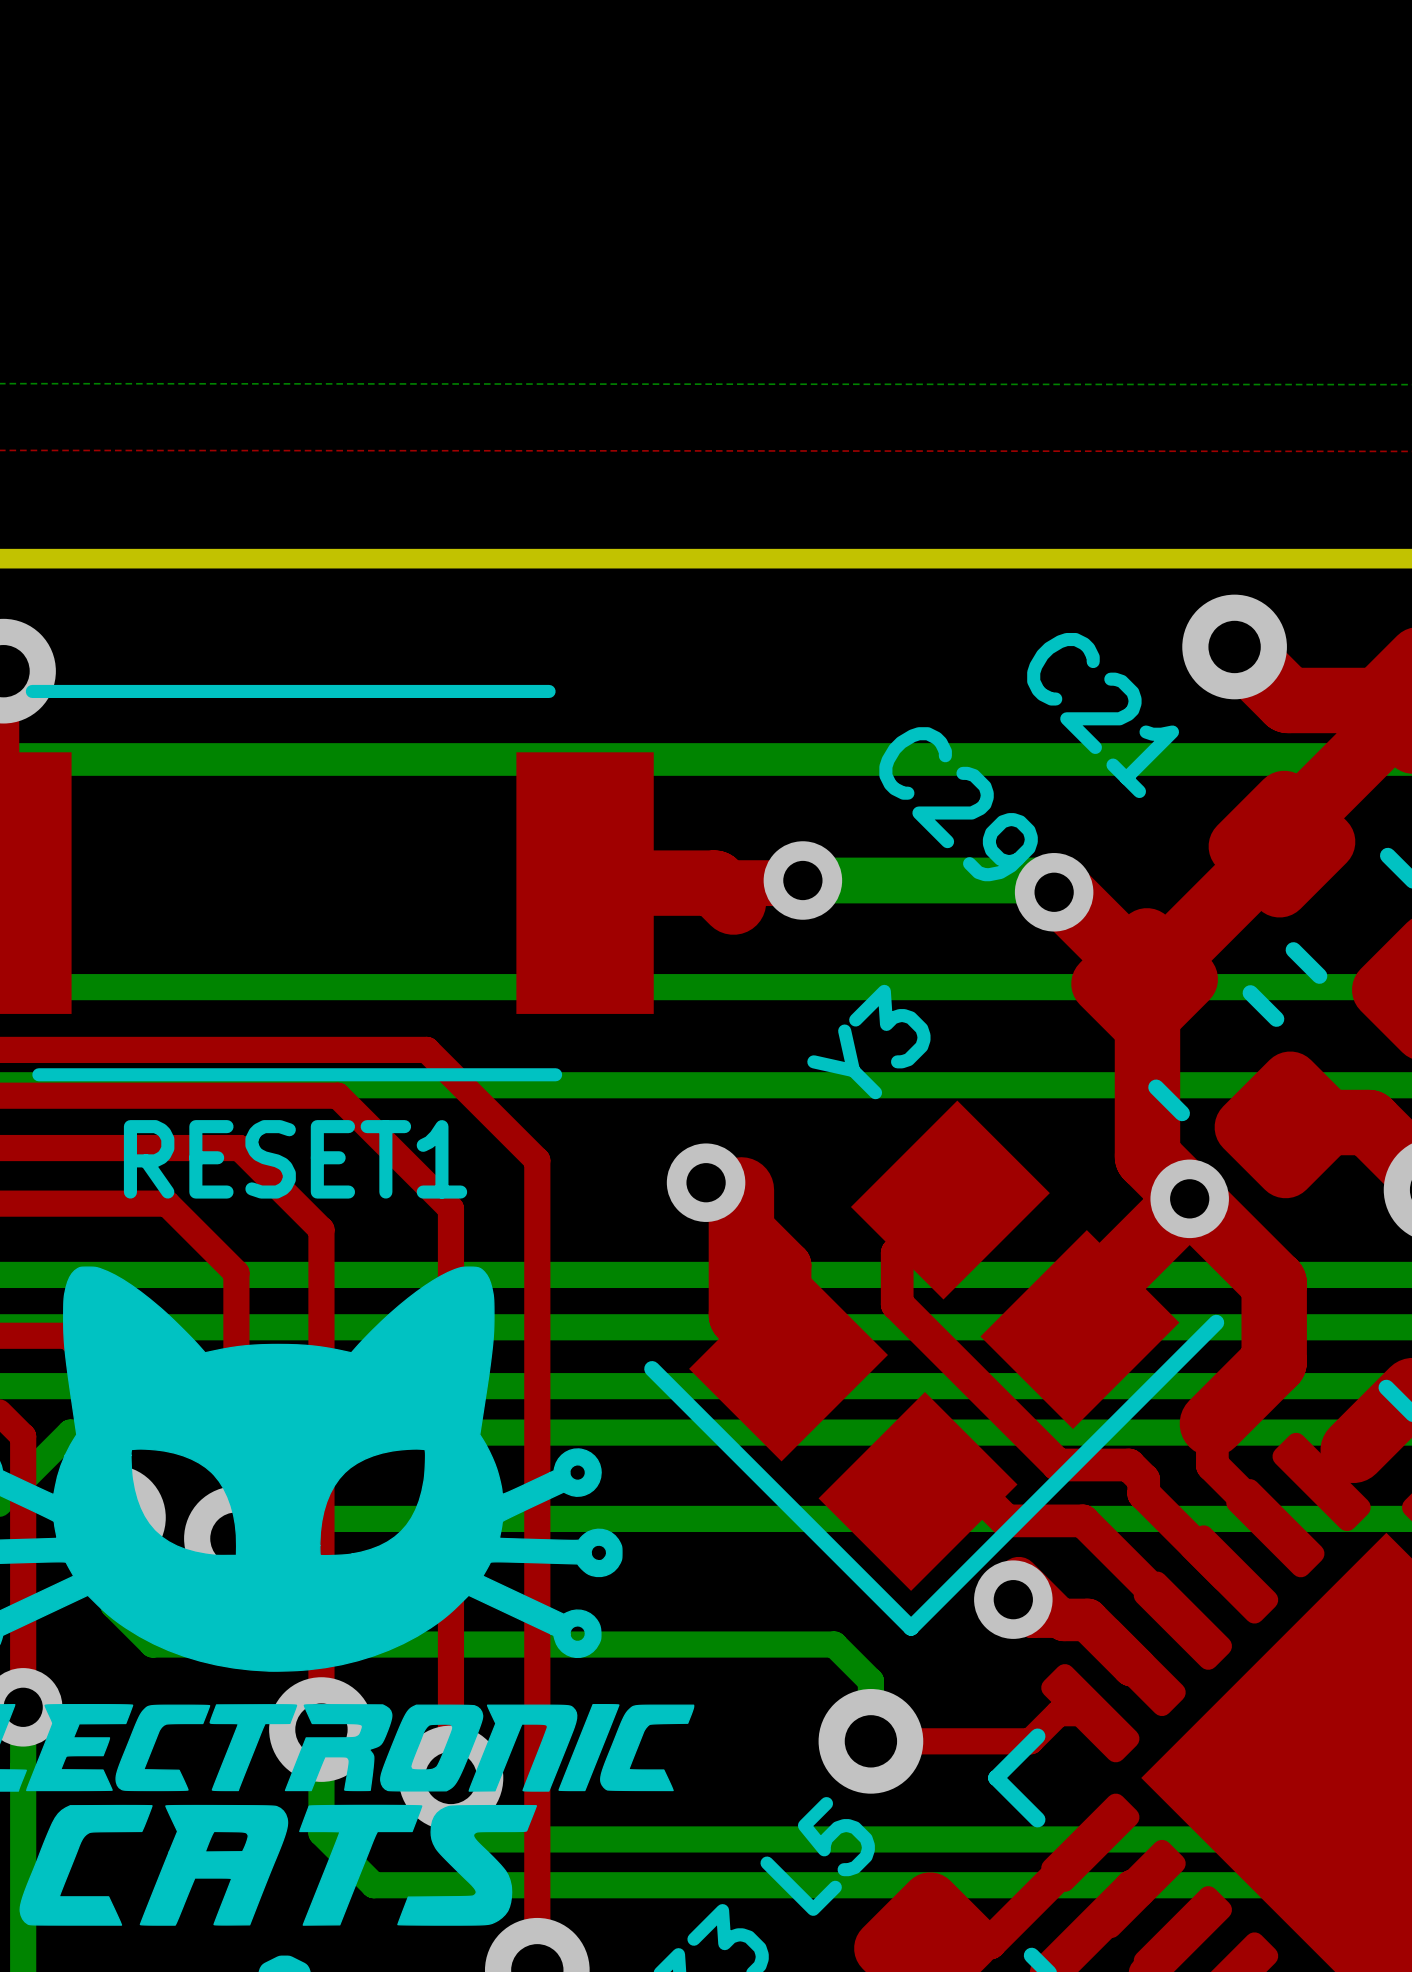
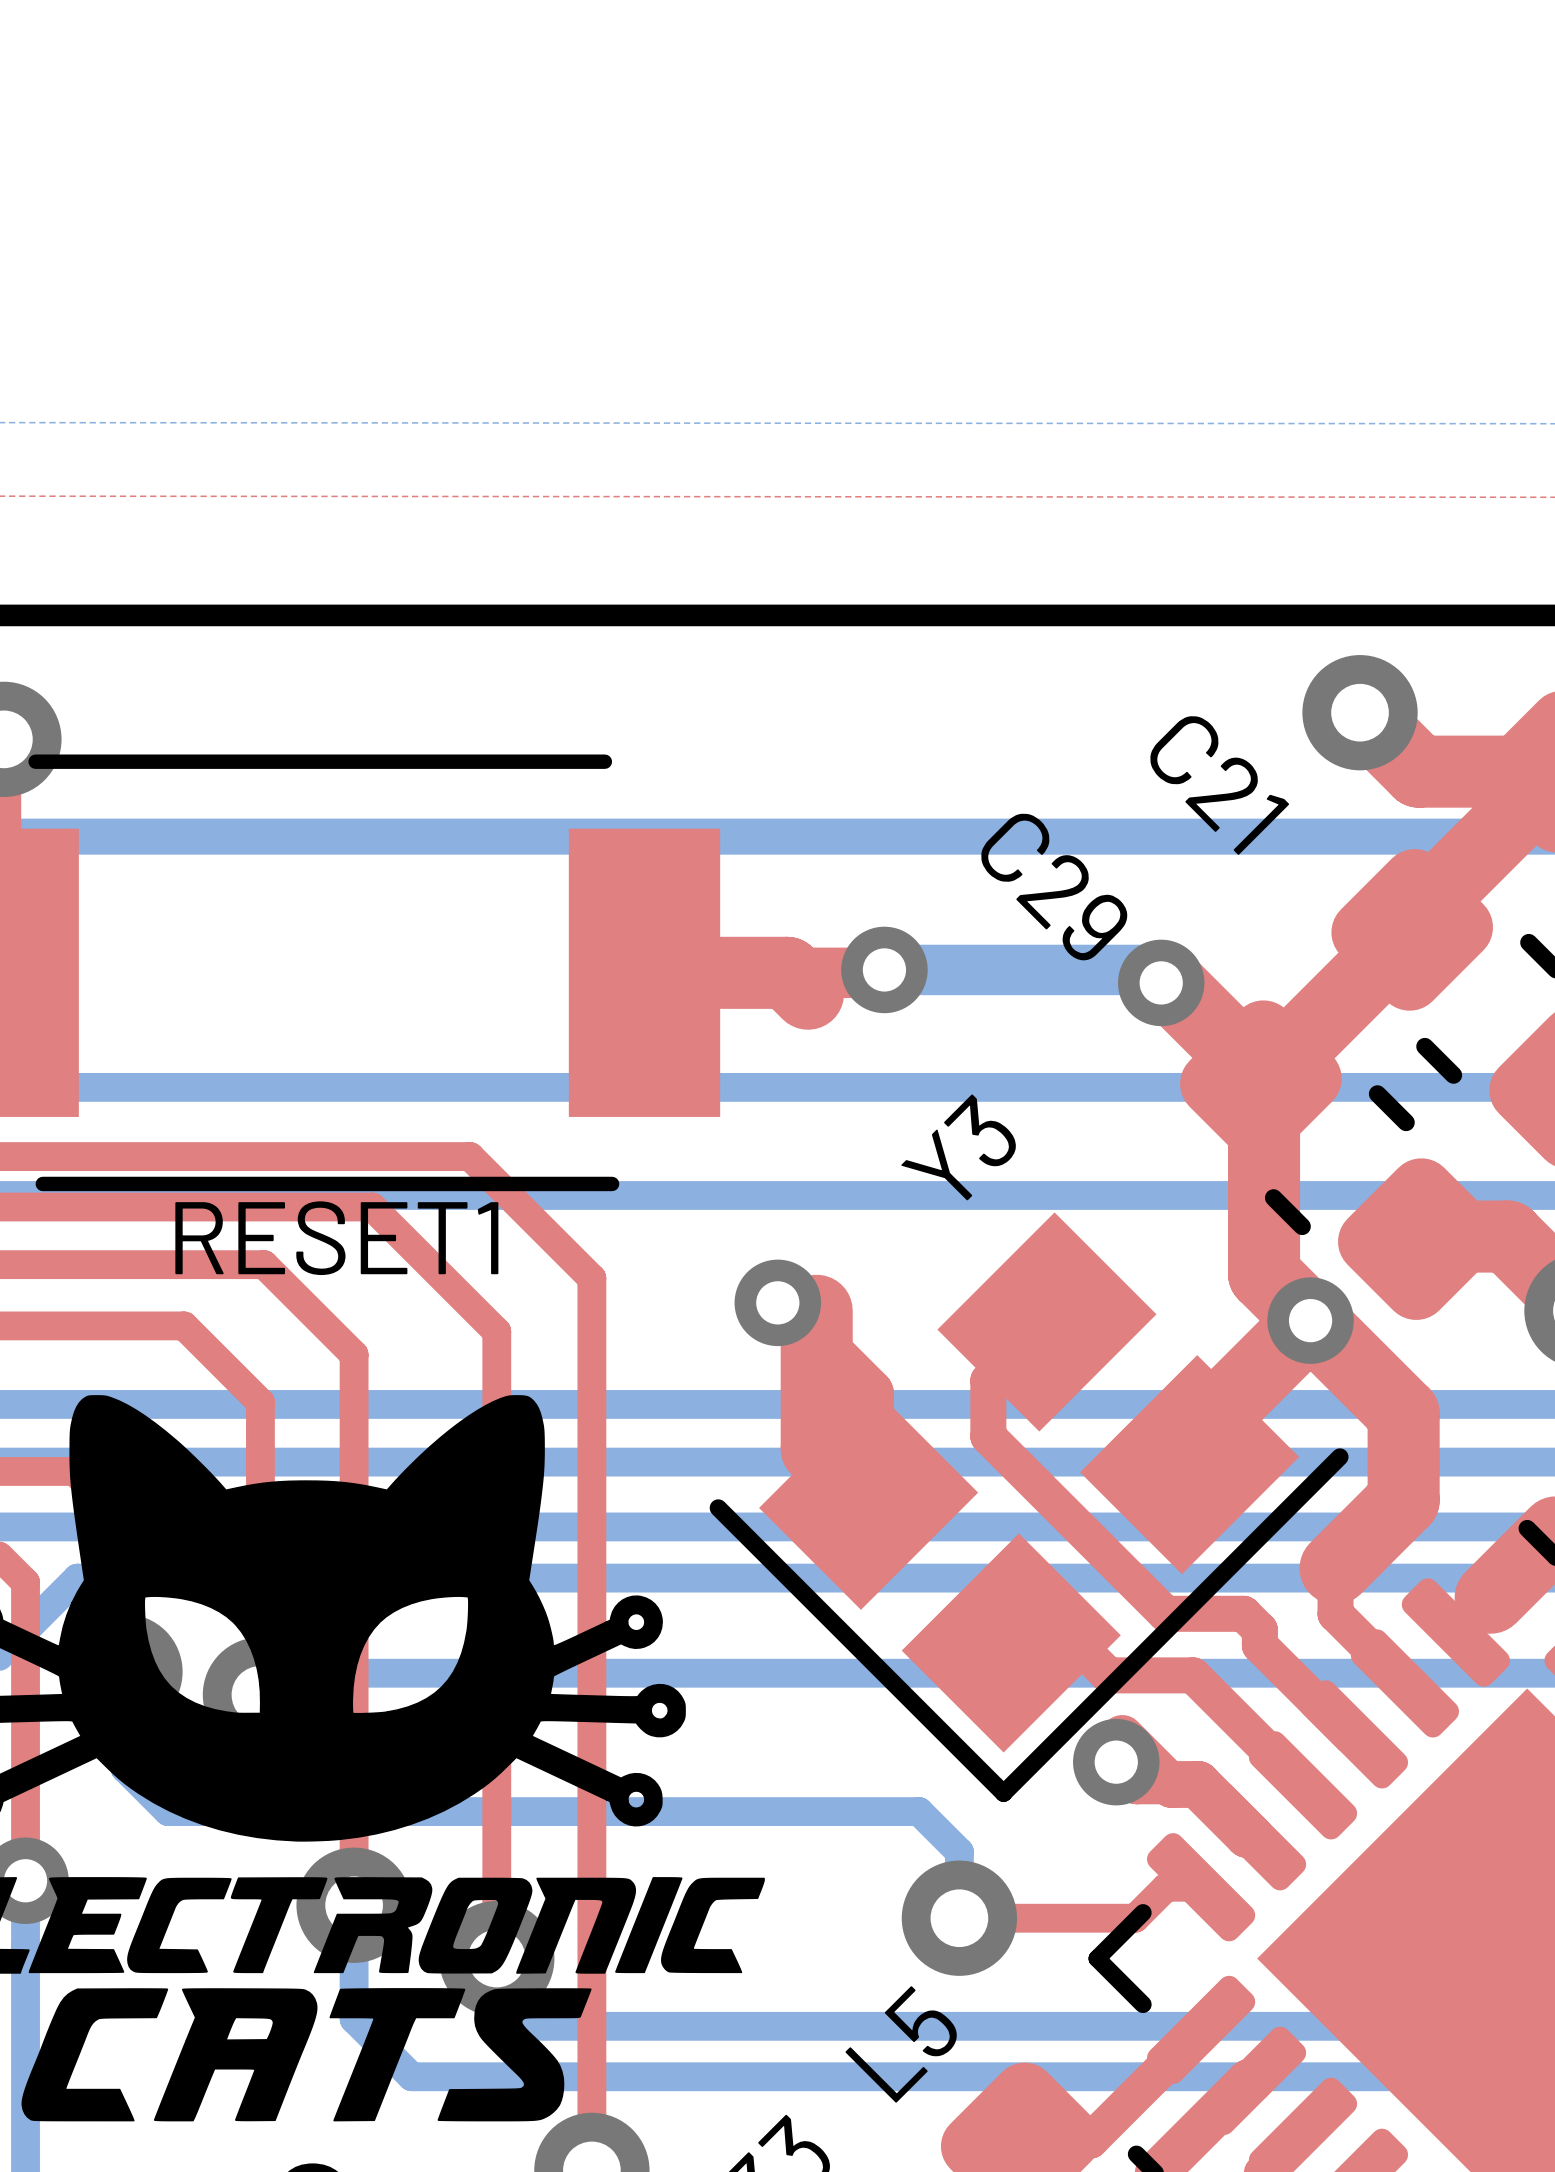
RESET1 name position: RESET1 (295, 1159) -> RESET1 (336, 1238)

